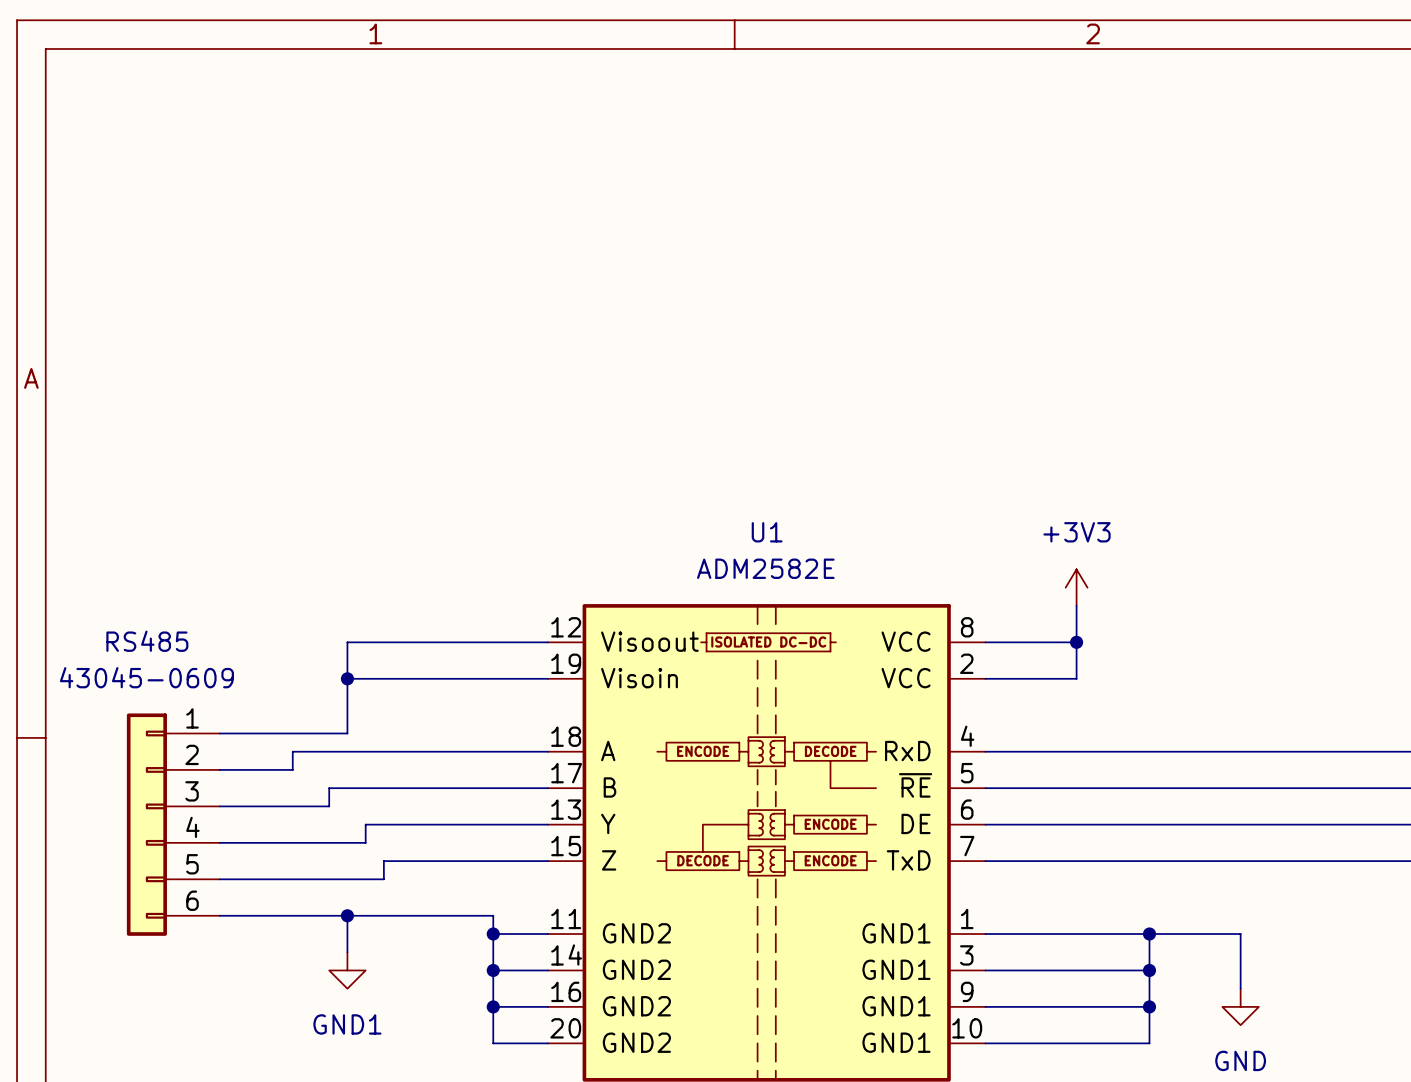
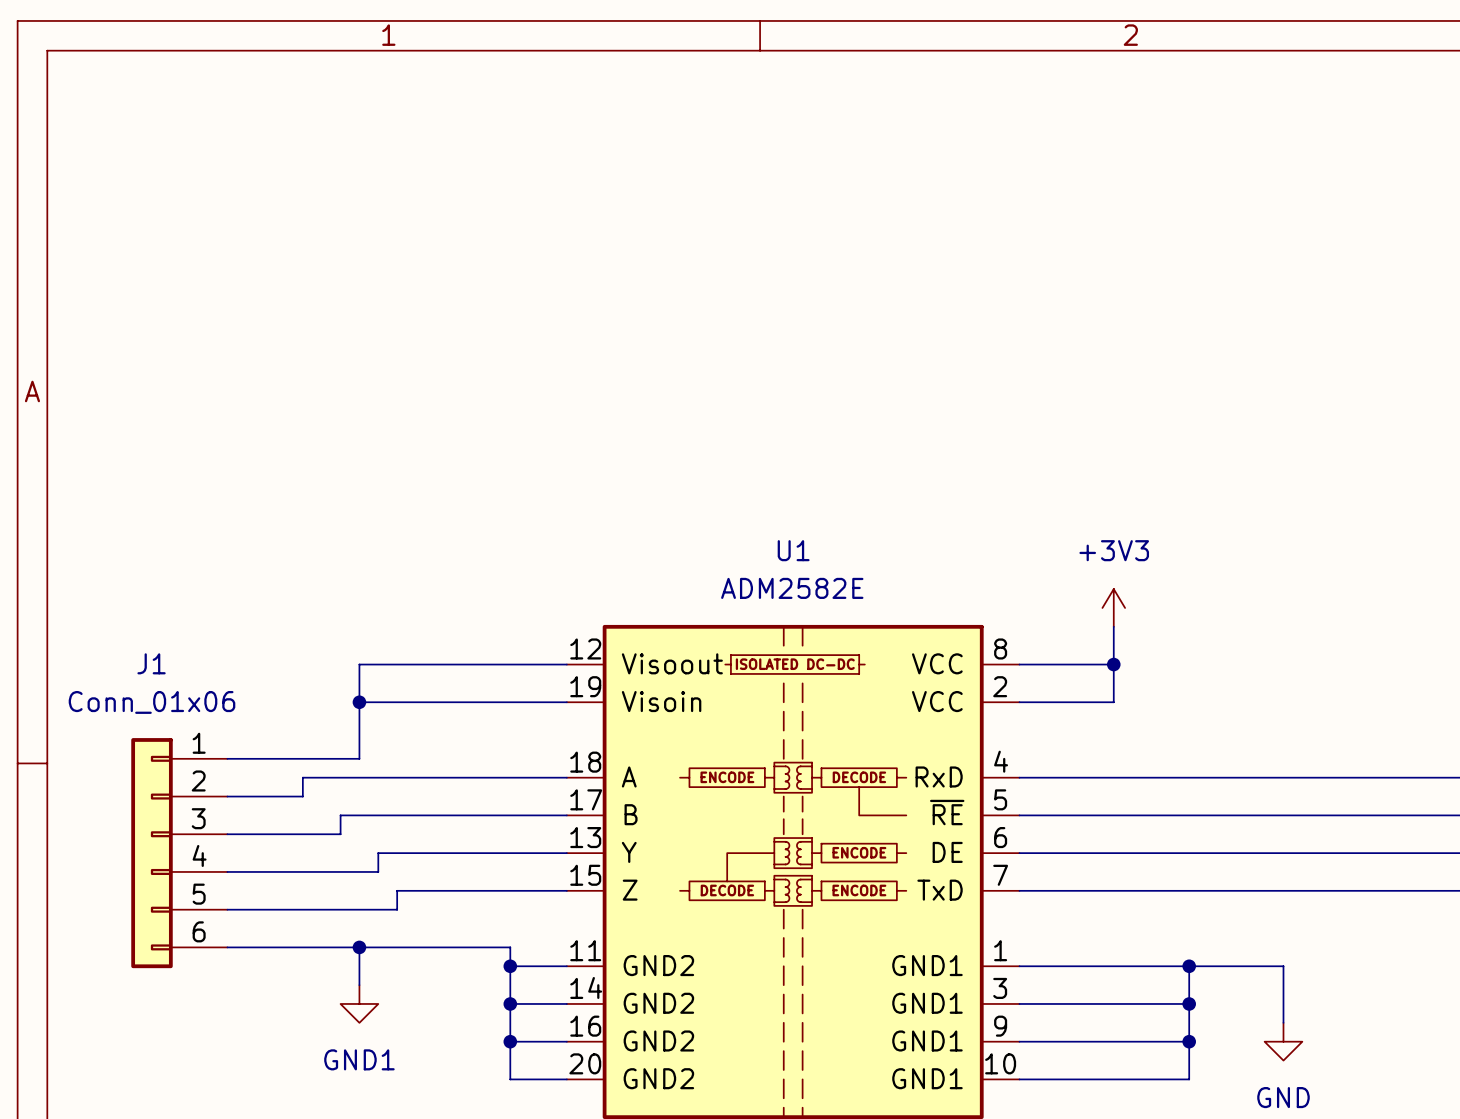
RS485 name: RS485 (147, 641) -> J1 (151, 663)
RS485 value: 43045-0609 (146, 677) -> Conn_01x06 (152, 702)

